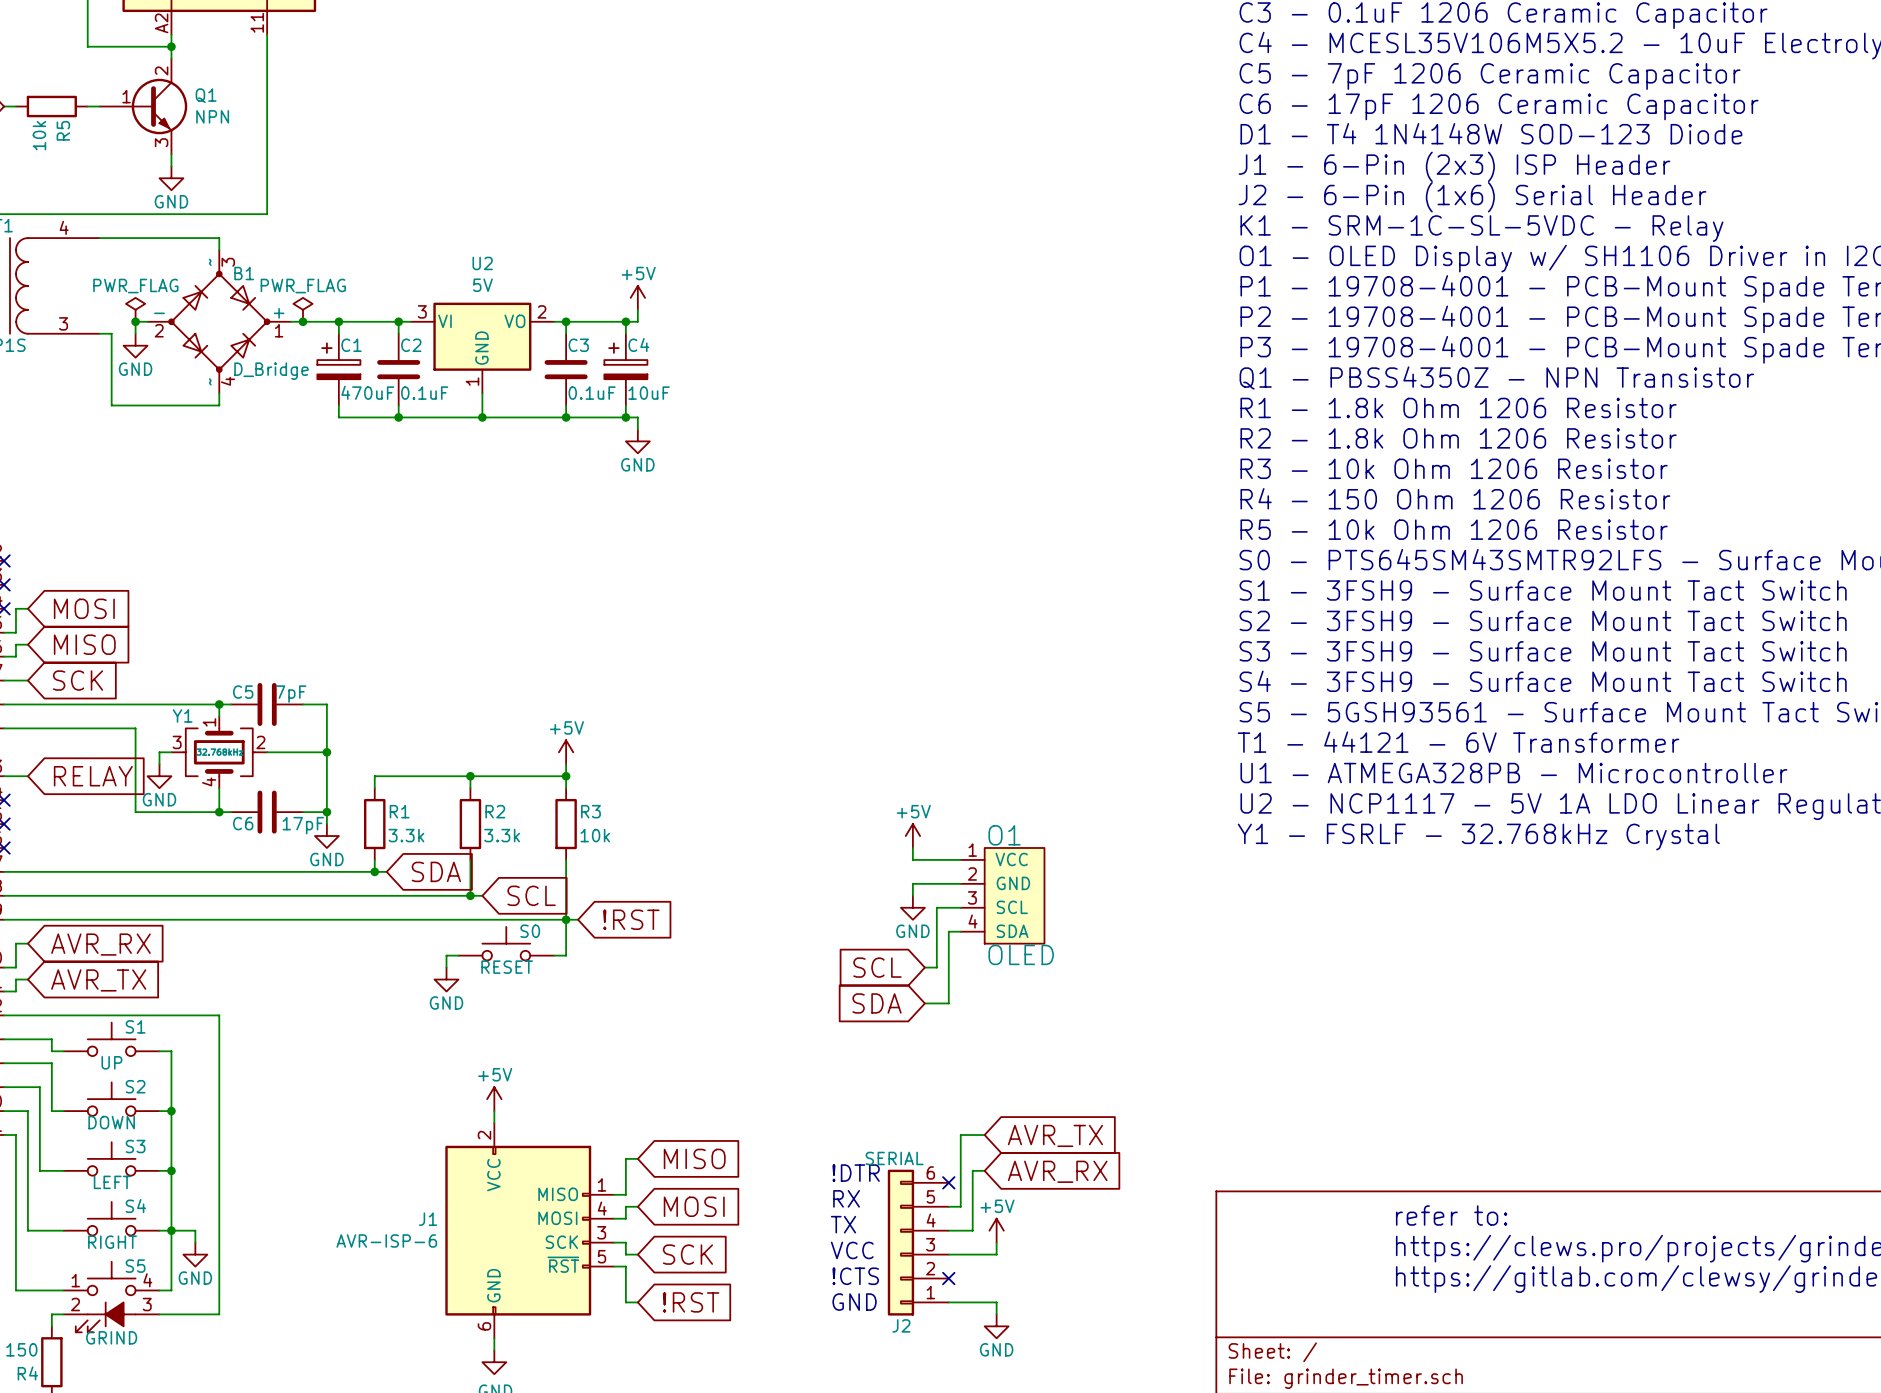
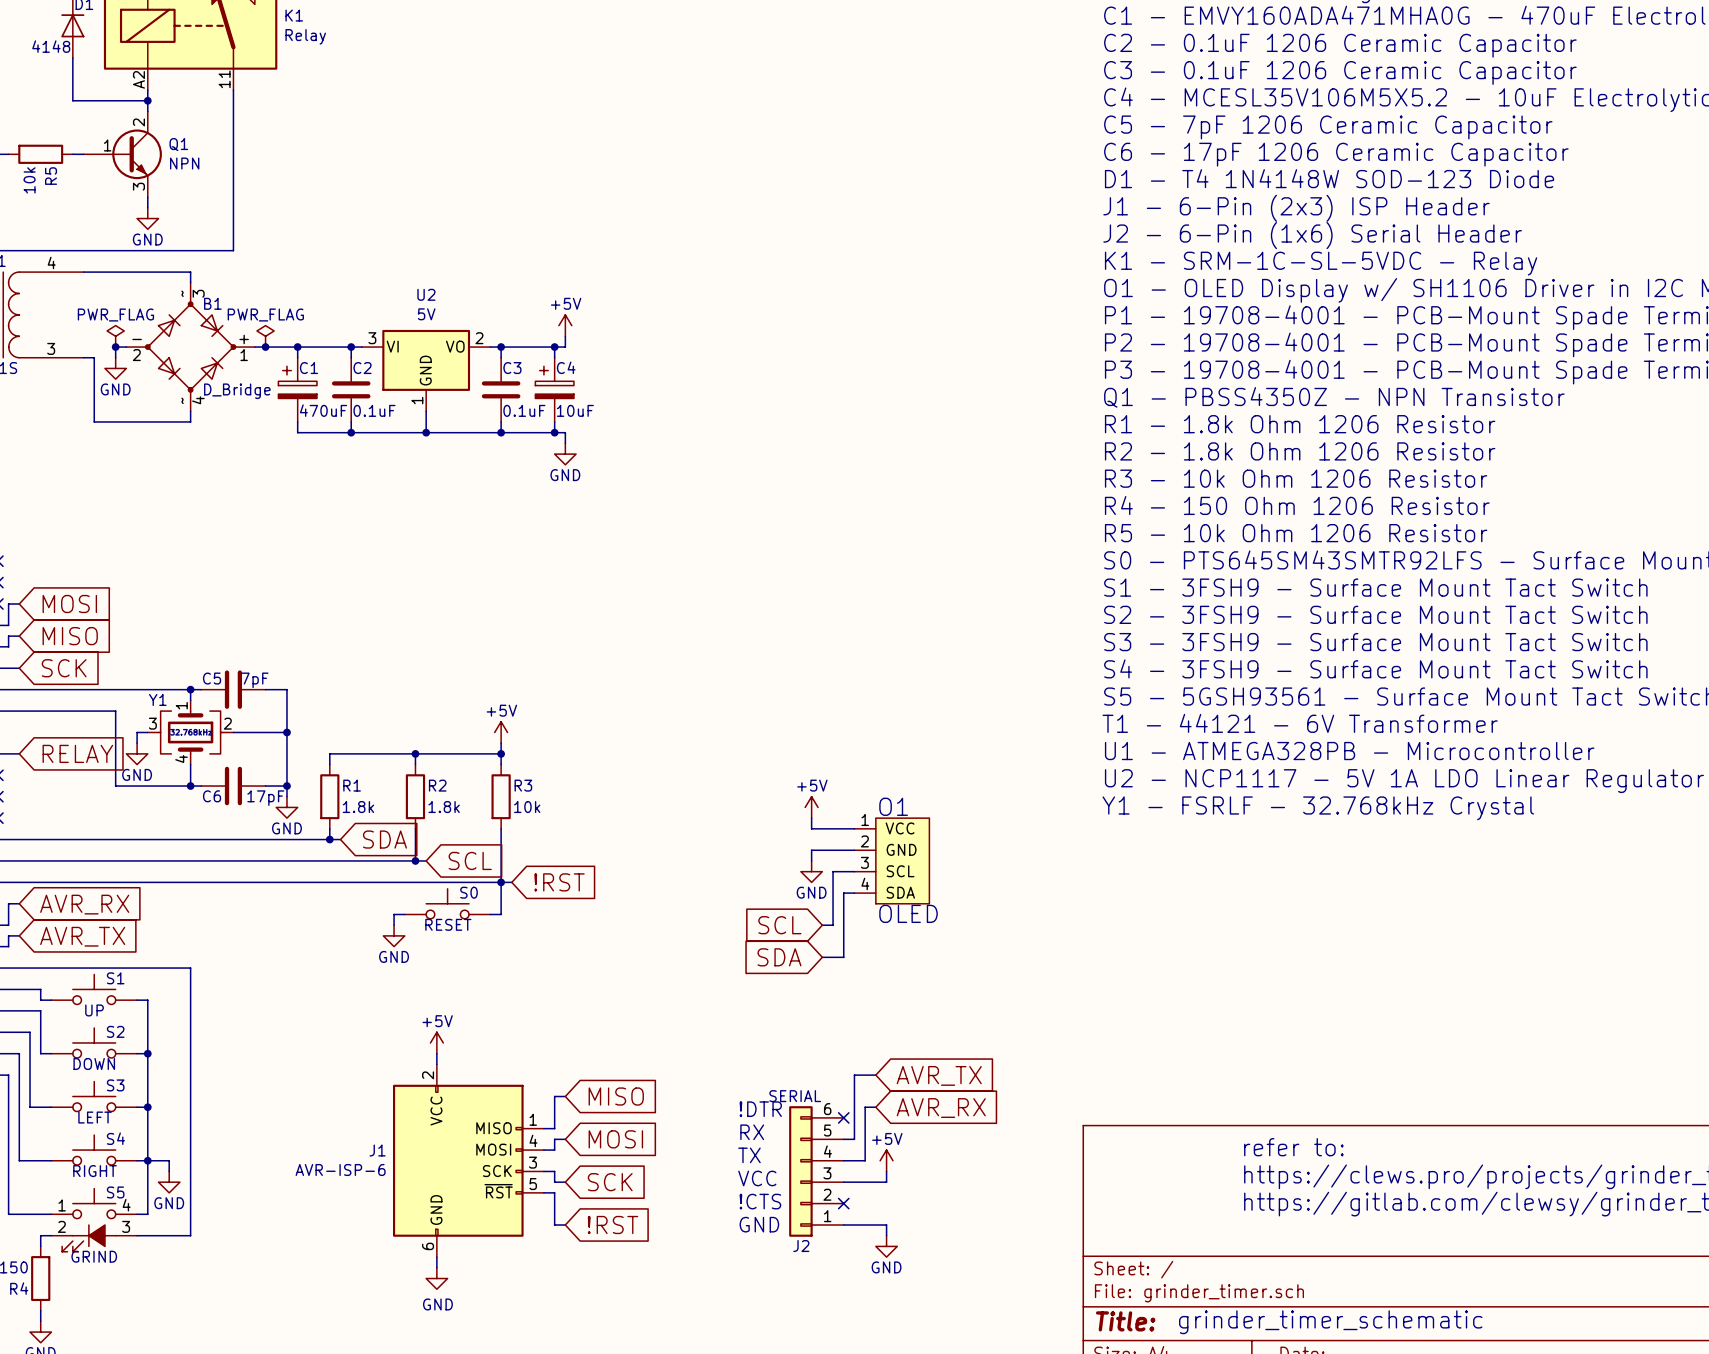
R1 value: 3.3k (406, 835) -> 1.8k (358, 807)
R2 value: 3.3k (502, 835) -> 1.8k (444, 807)

